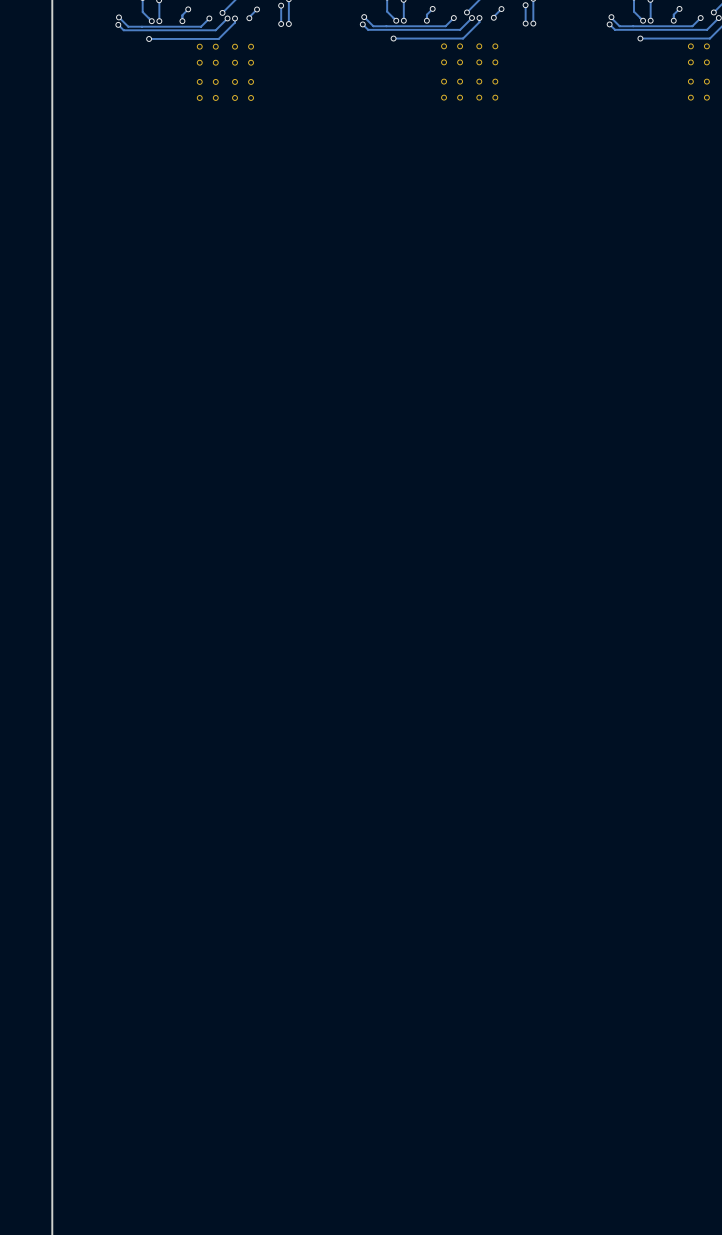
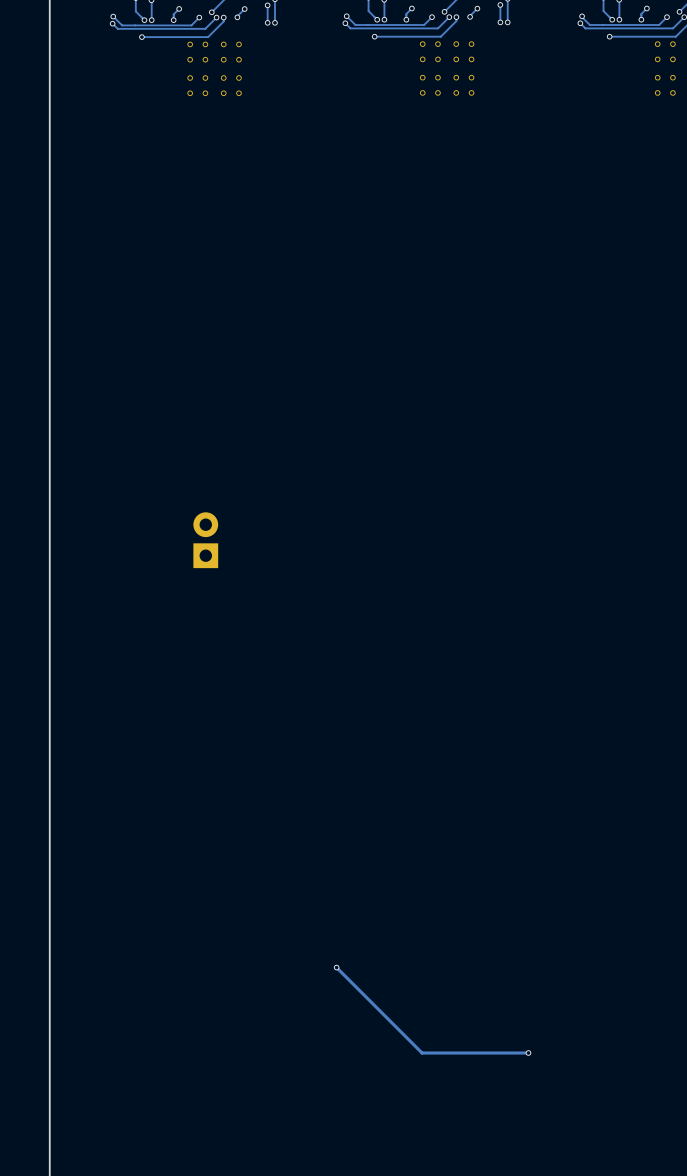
part: none -> (205, 540)
track: none -> (336, 967) (422, 1053) (528, 1053)
via: none -> (336, 967)
via: none -> (528, 1053)

